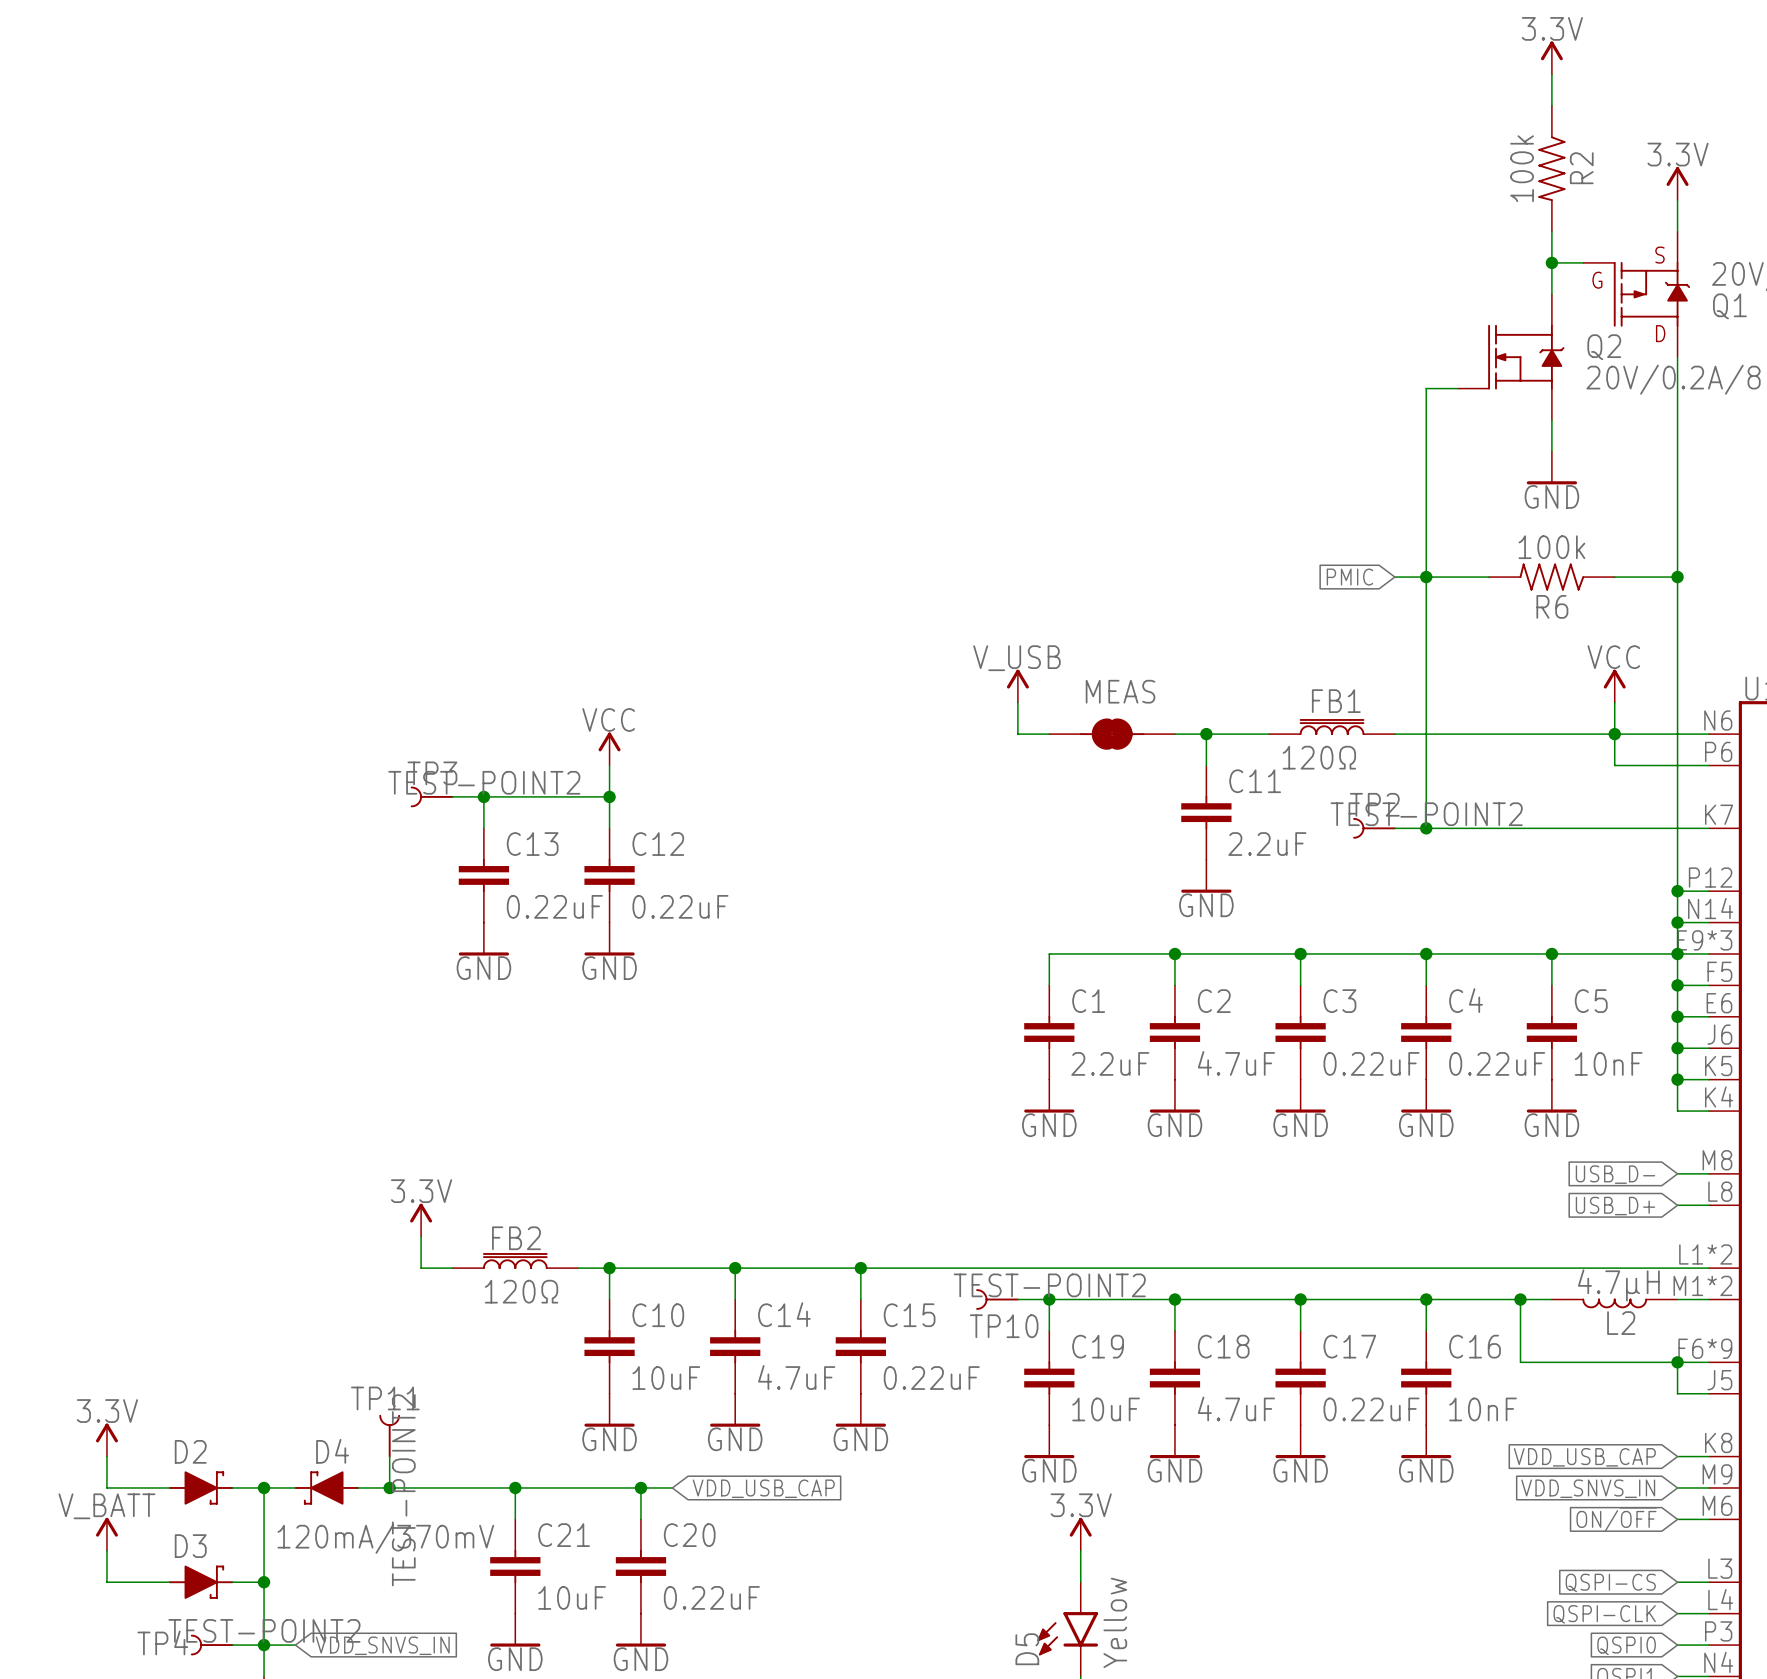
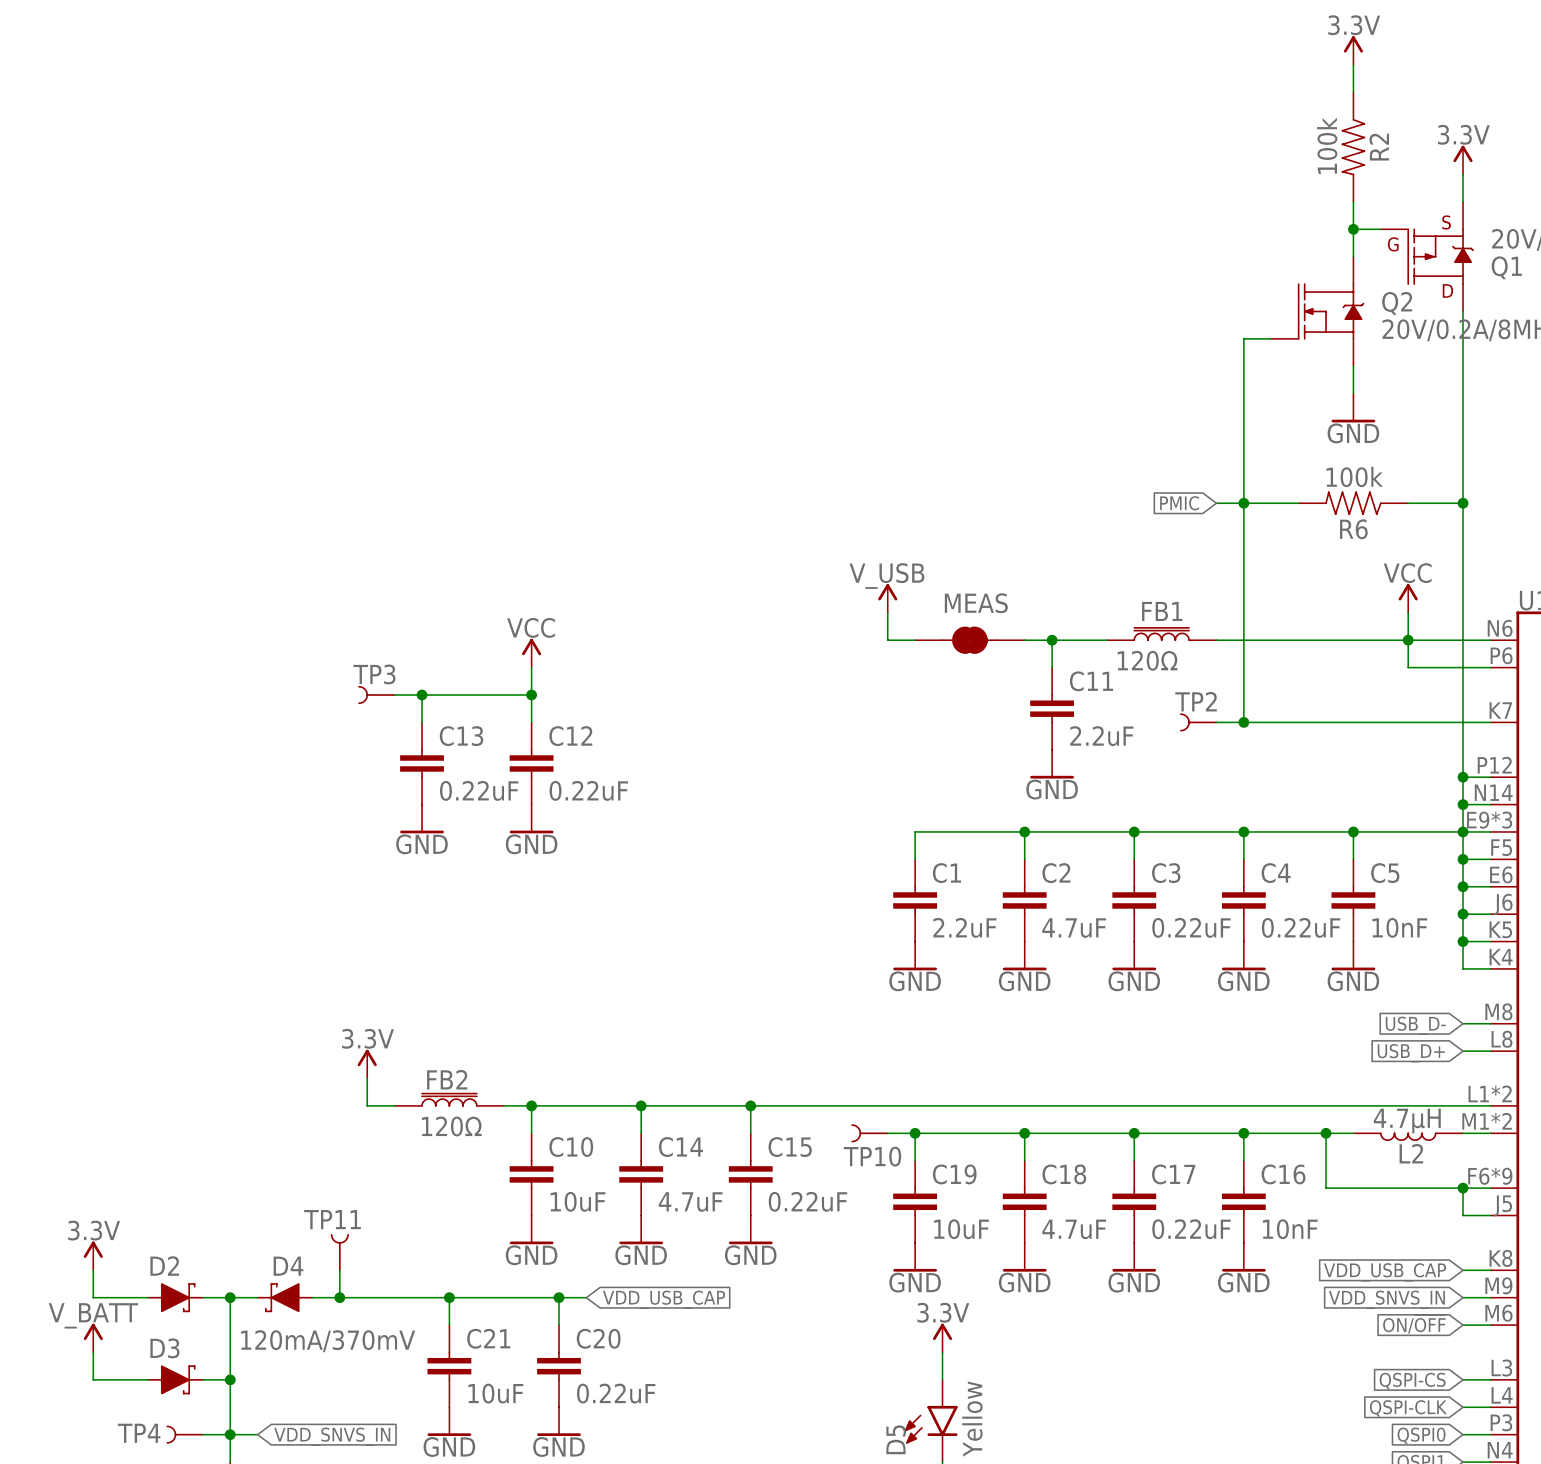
TP3 value: TEST-POINT2 (484, 782) -> none
TP2 value: TEST-POINT2 (1426, 814) -> none
TP10 value: TEST-POINT2 (1049, 1285) -> none
TP11 value: TEST-POINT2 (403, 1490) -> none
TP4 value: TEST-POINT2 (264, 1630) -> none

